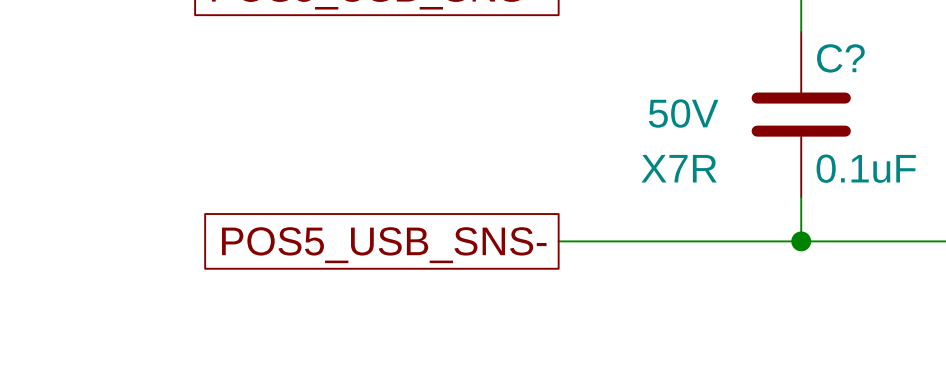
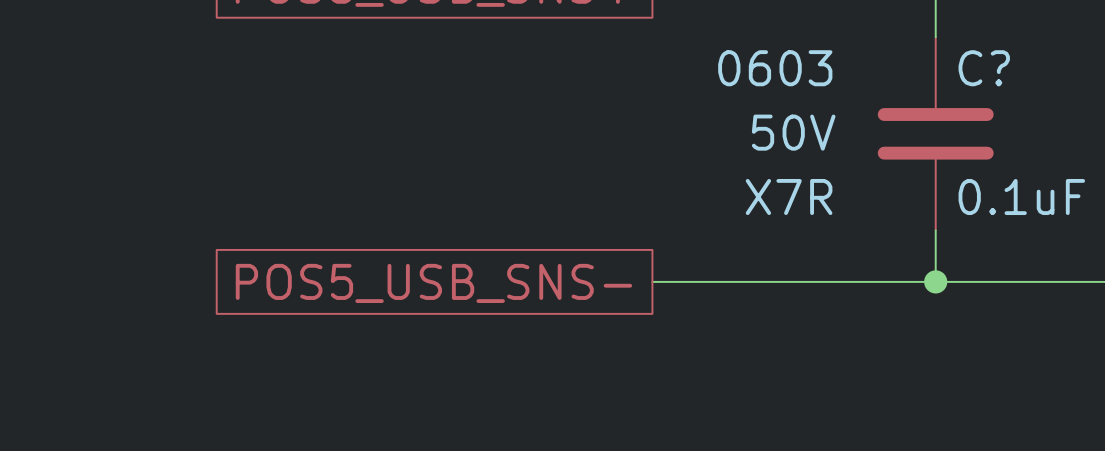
C? text: none -> 0603 (775, 68)

